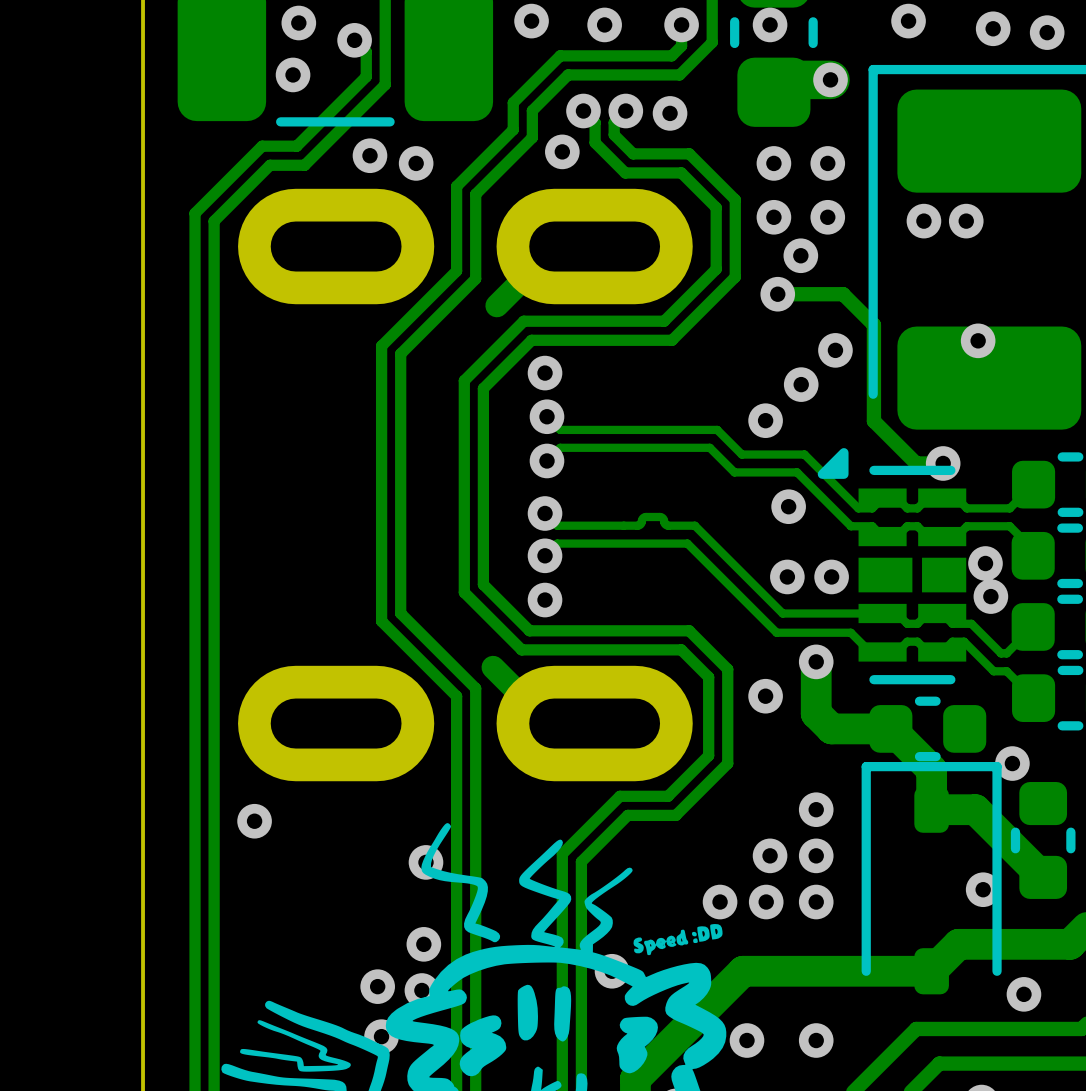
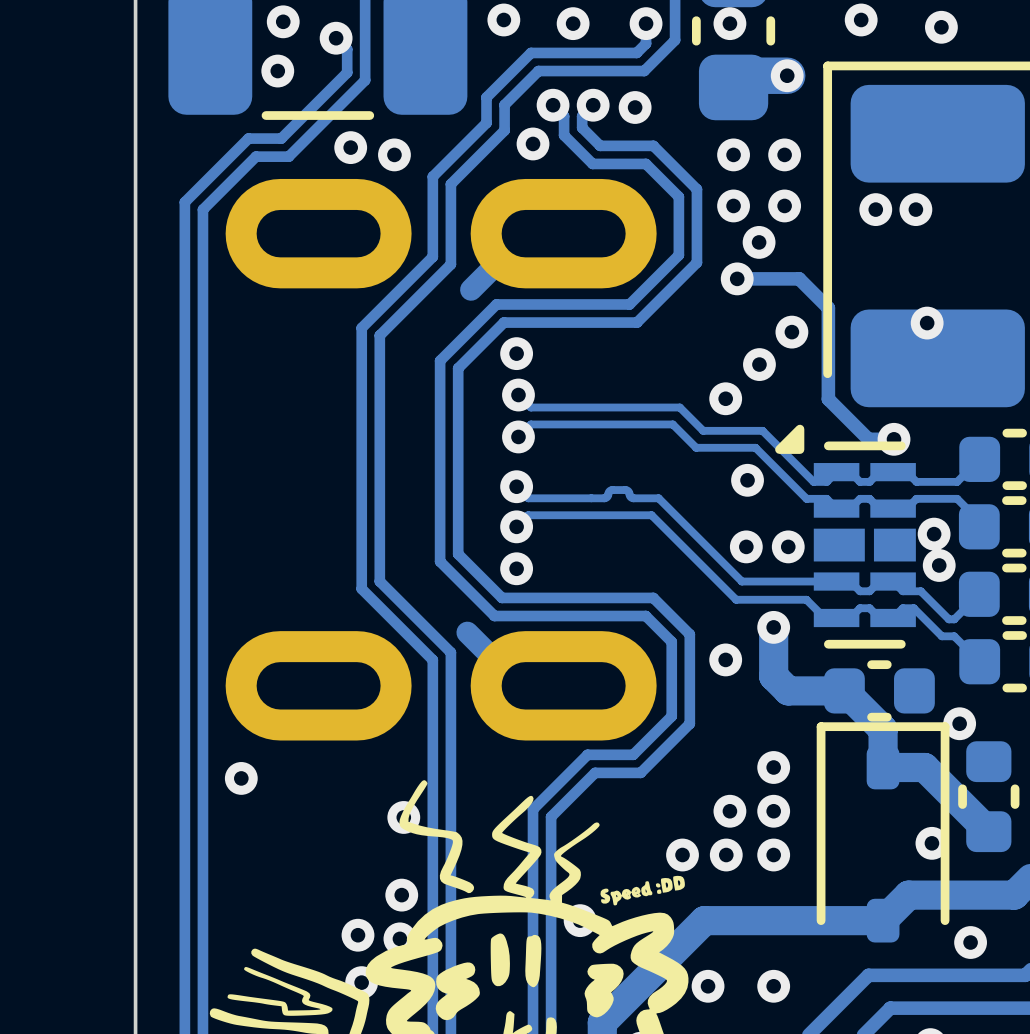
via: (1047, 32) -> none

